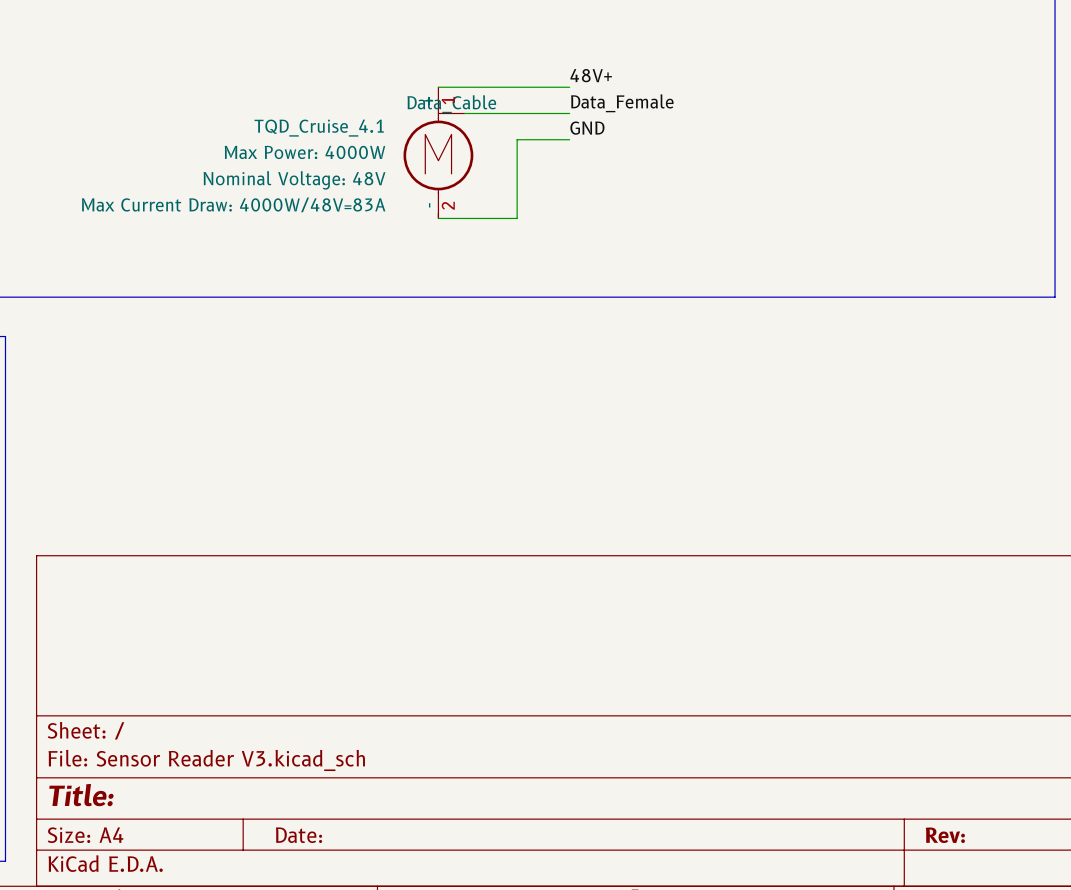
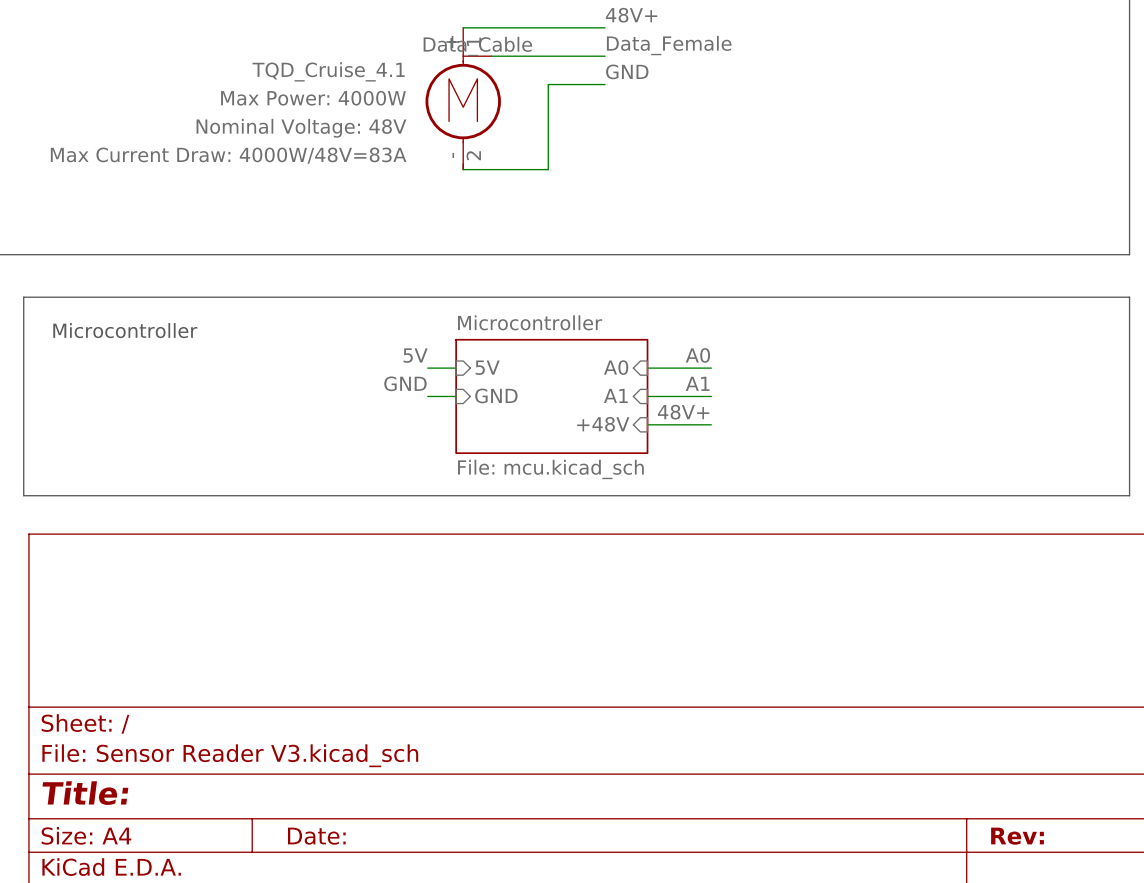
line: none -> (23, 297) (1129, 297) (1129, 495) (23, 495) (23, 297)
text: none -> Microcontroller (125, 330)
label: none -> 5V (415, 355)
label: none -> A0 (697, 355)
sheet pin: none -> 5V (487, 367)
sheet pin: none -> A0 (616, 367)
wire: none -> (427, 368) (456, 368)
wire: none -> (647, 368) (711, 368)
label: none -> GND (405, 383)
label: none -> A1 (697, 383)
sheet pin: none -> GND (496, 395)
sheet pin: none -> A1 (615, 395)
wire: none -> (427, 396) (456, 396)
sheet Microcontroller: none -> File: mcu.kicad_sch (551, 396)
wire: none -> (647, 396) (711, 396)
label: none -> 48V+ (683, 412)
sheet pin: none -> +48V (603, 424)
wire: none -> (647, 424) (711, 424)

